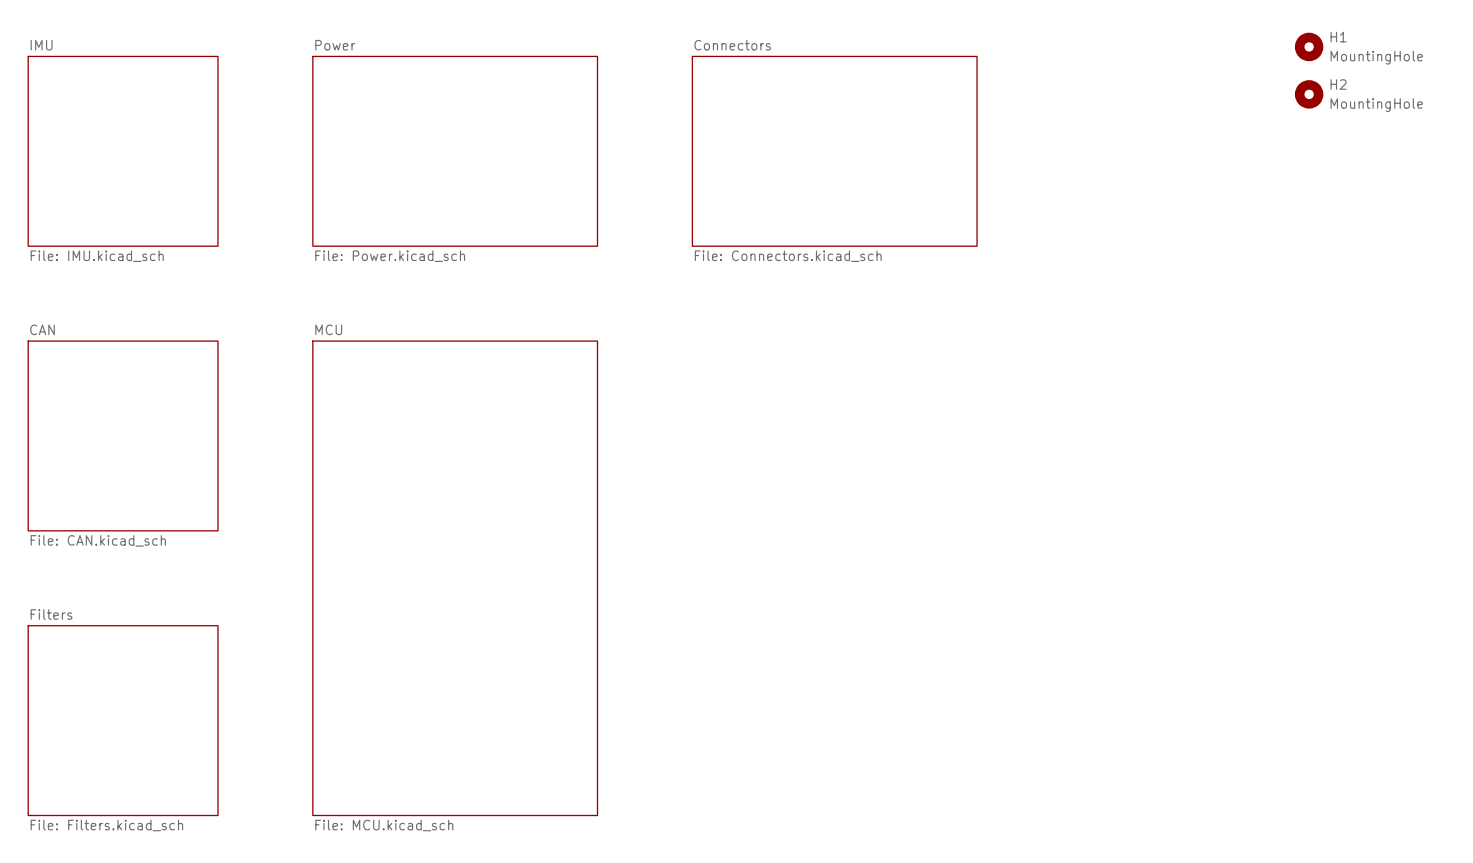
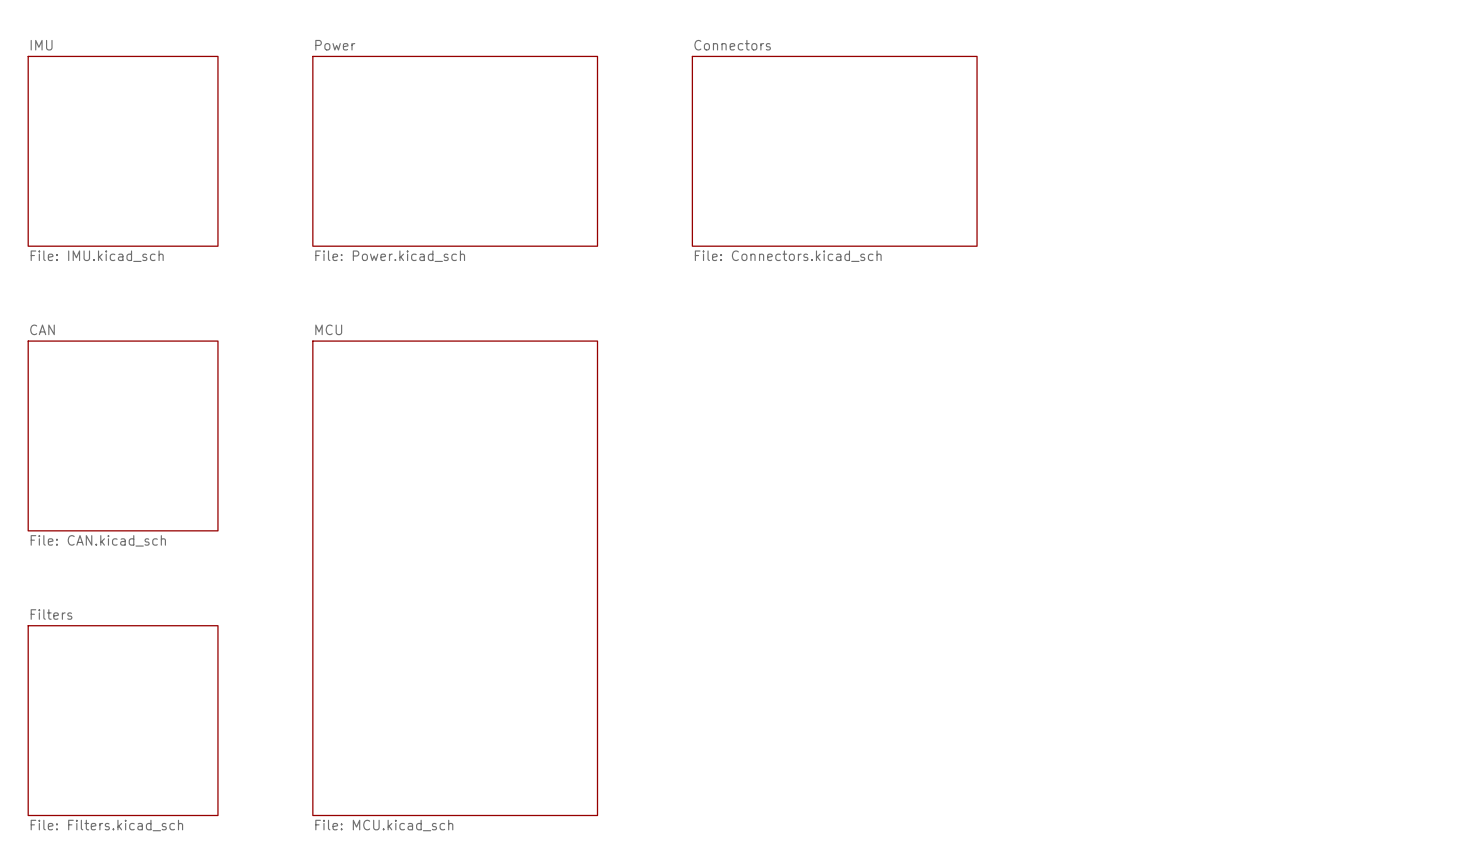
H1: MountingHole (1309, 46) -> none
H2: MountingHole (1309, 94) -> none

